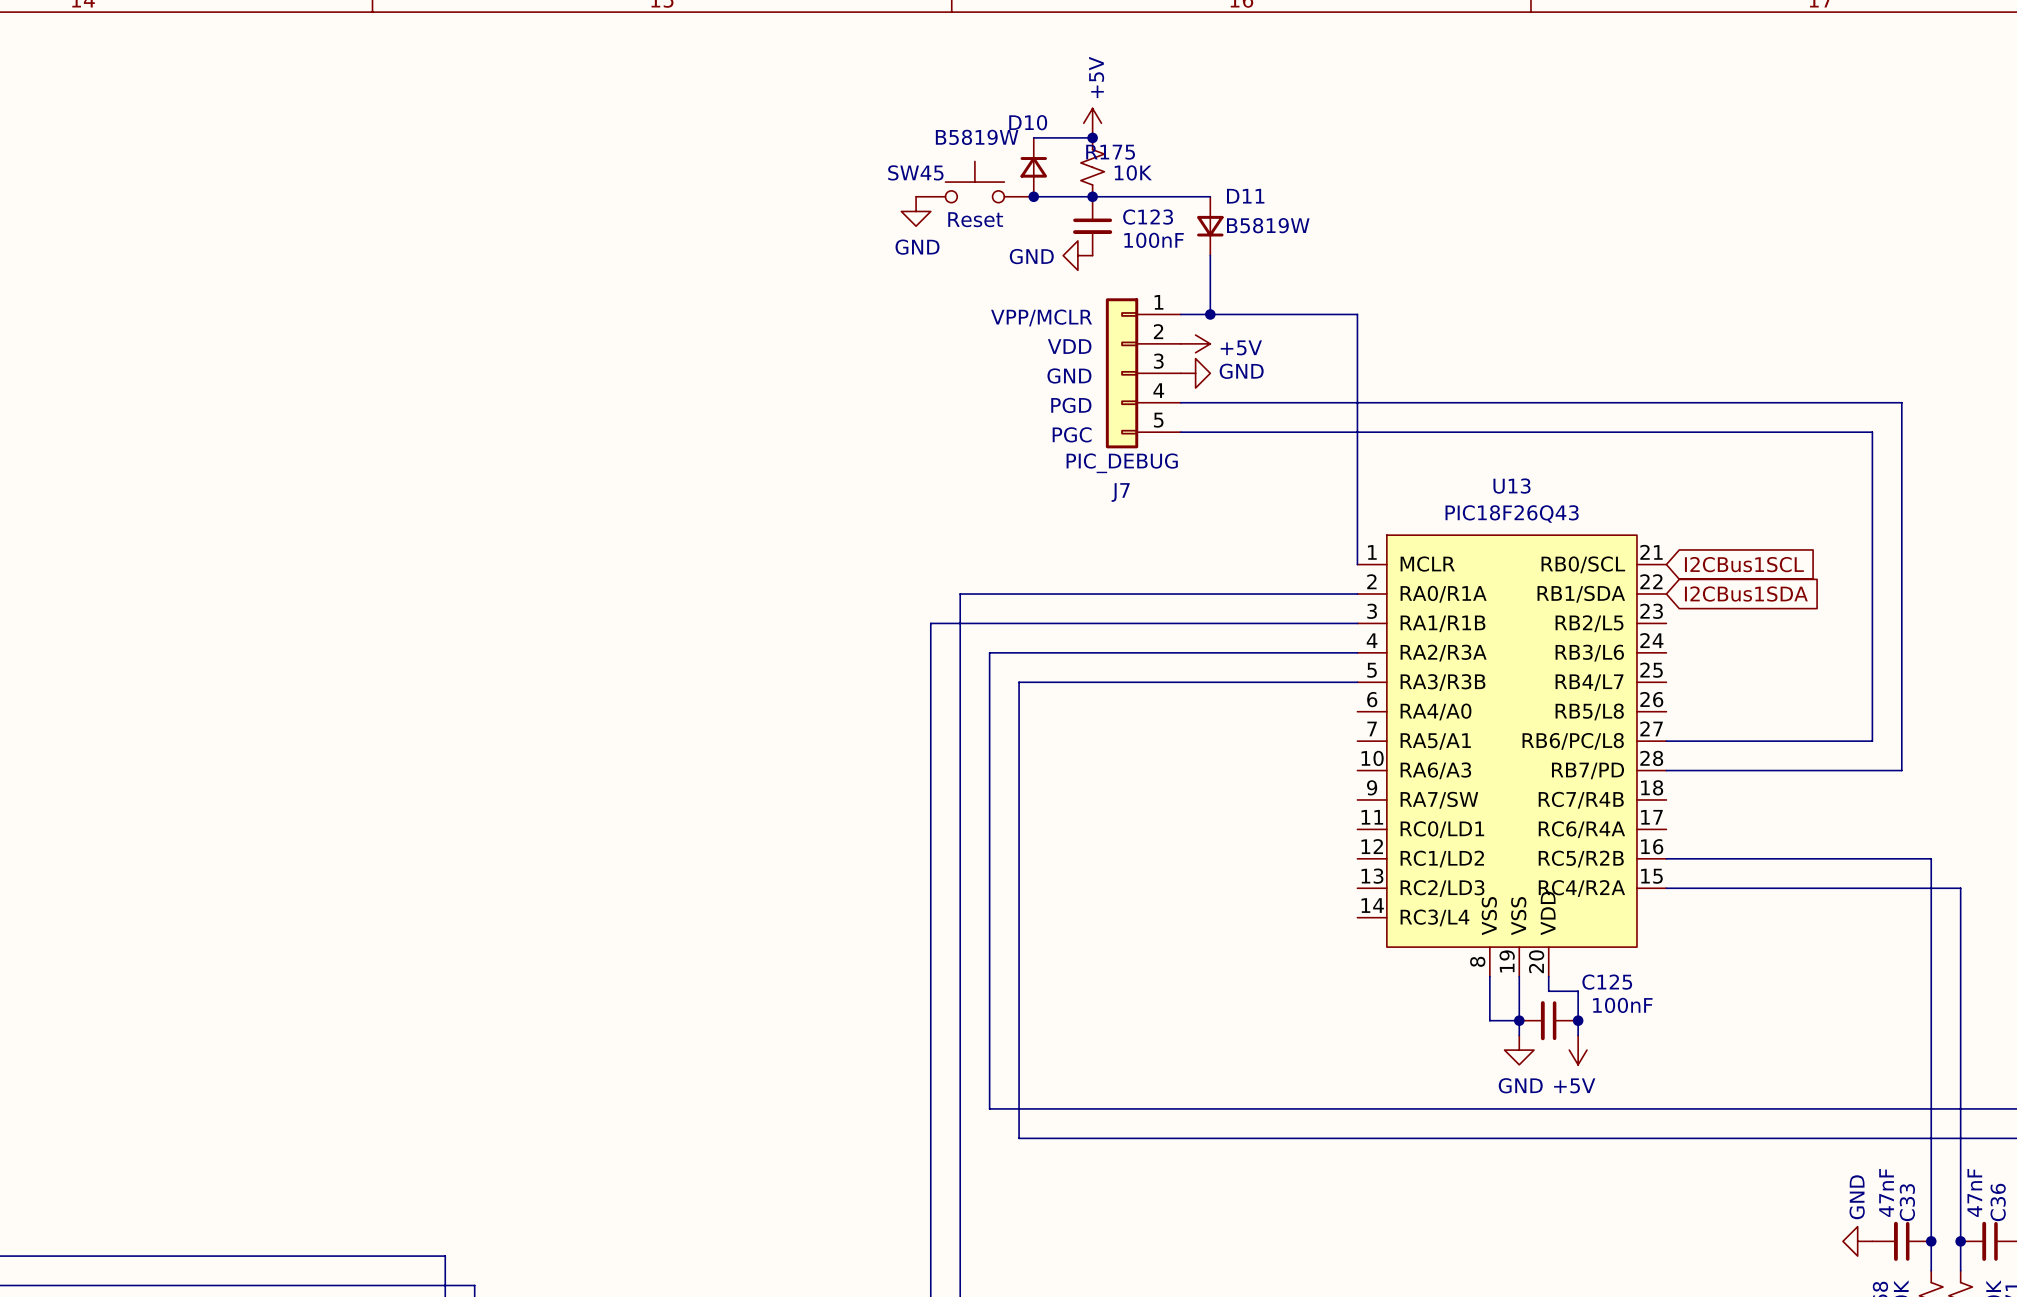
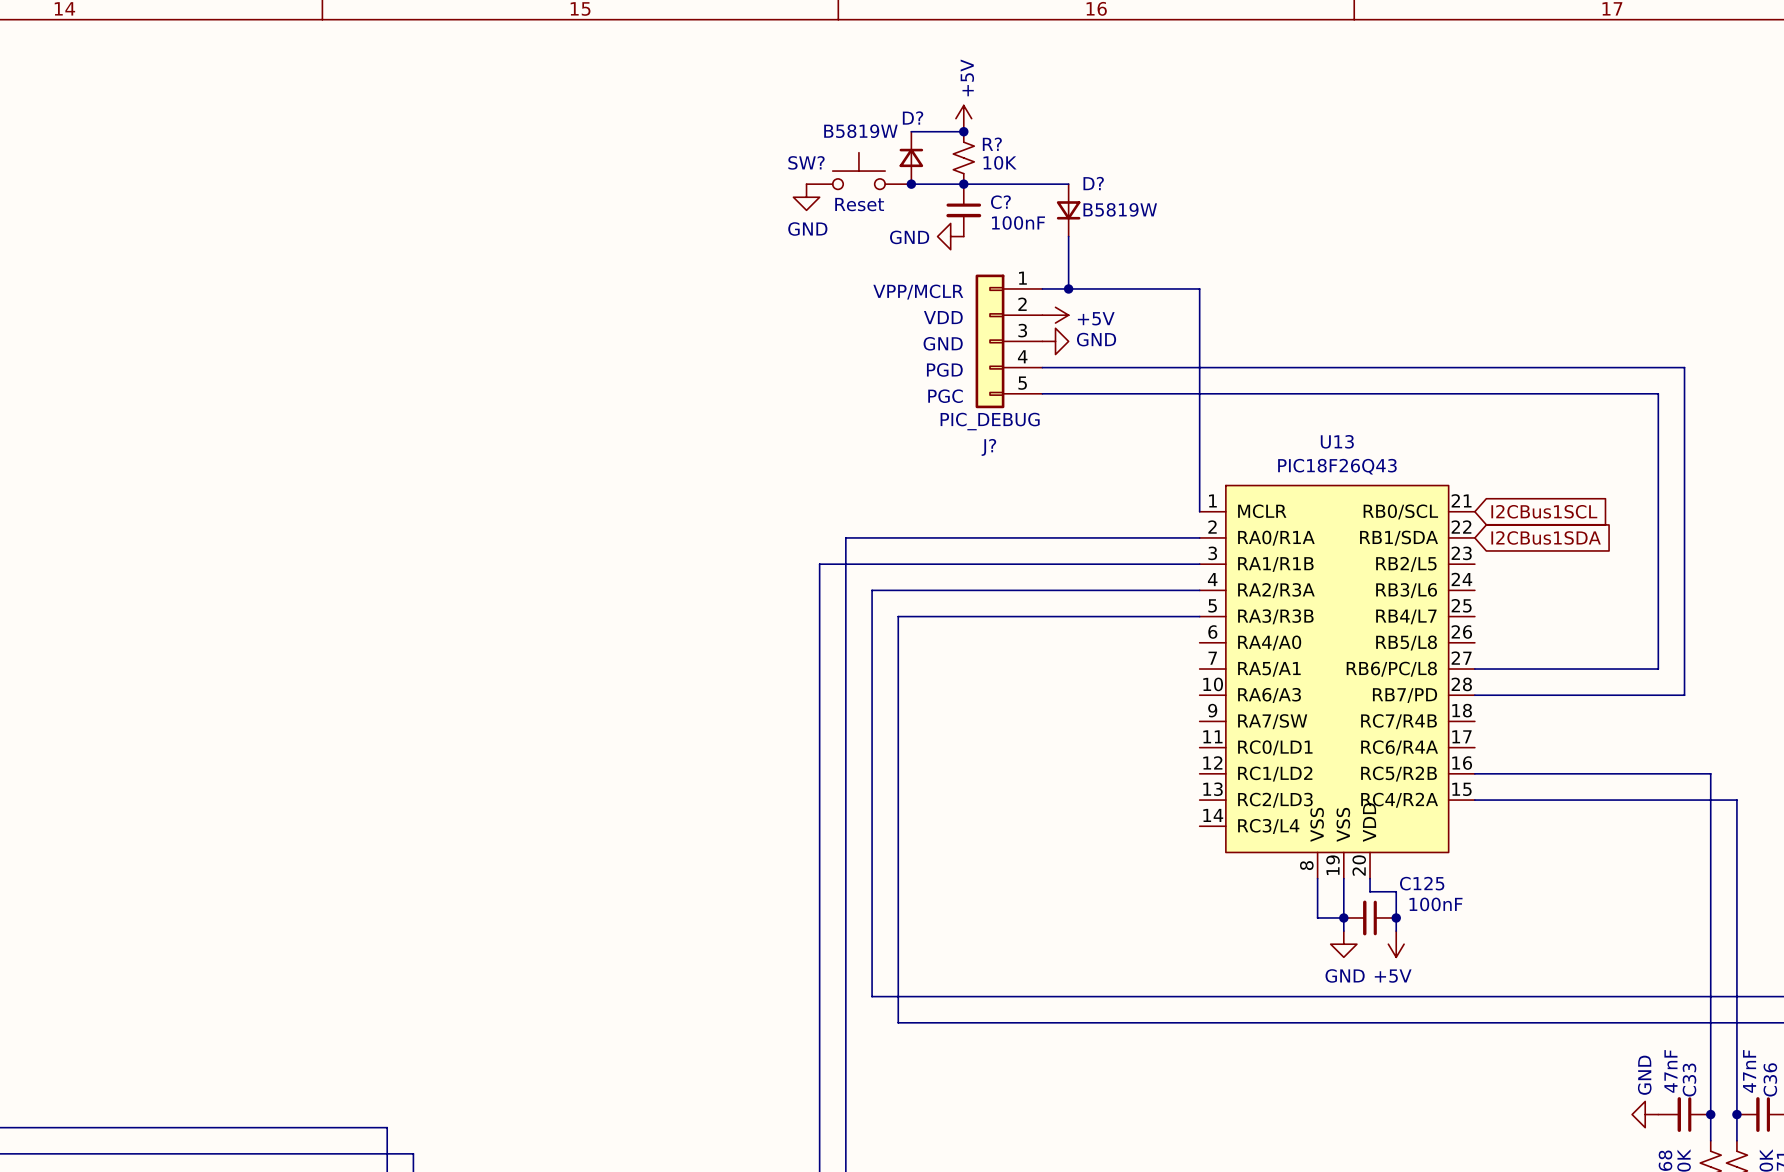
D10 name: D10 (1028, 122) -> D? (913, 118)
R175 name: R175 (1110, 152) -> R? (992, 144)
SW45 name: SW45 (915, 172) -> SW? (806, 162)
D11 name: D11 (1245, 196) -> D? (1093, 183)
C123 name: C123 (1148, 217) -> C? (1000, 202)
J7 name: J7 (1120, 492) -> J? (988, 447)

